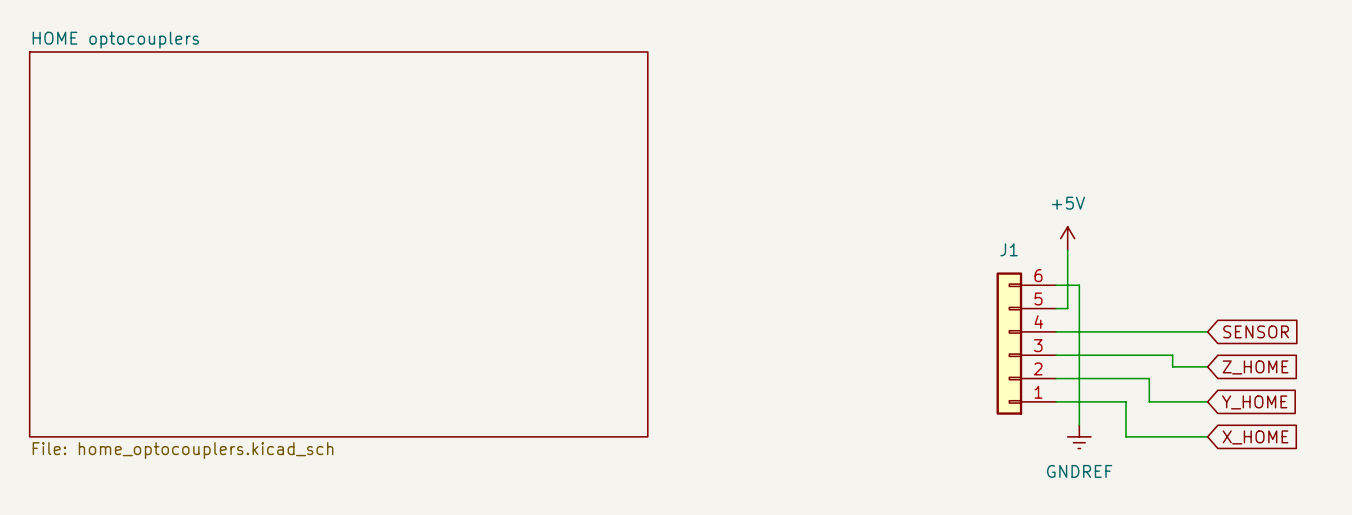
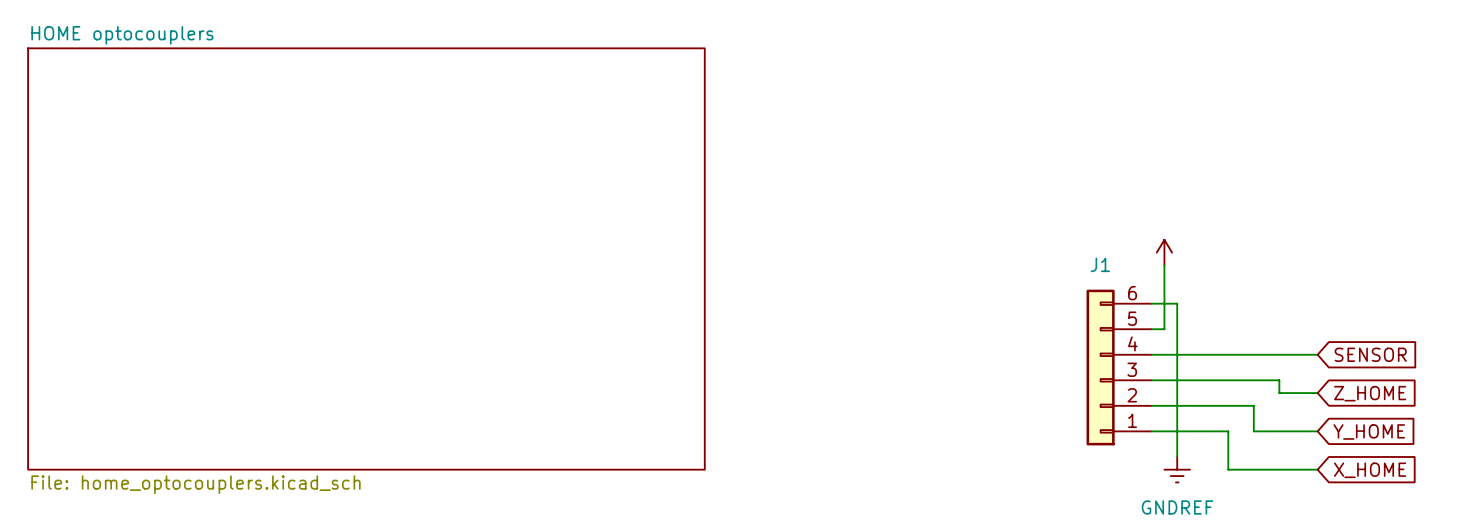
power symbol text: +5V (1068, 203) -> none

